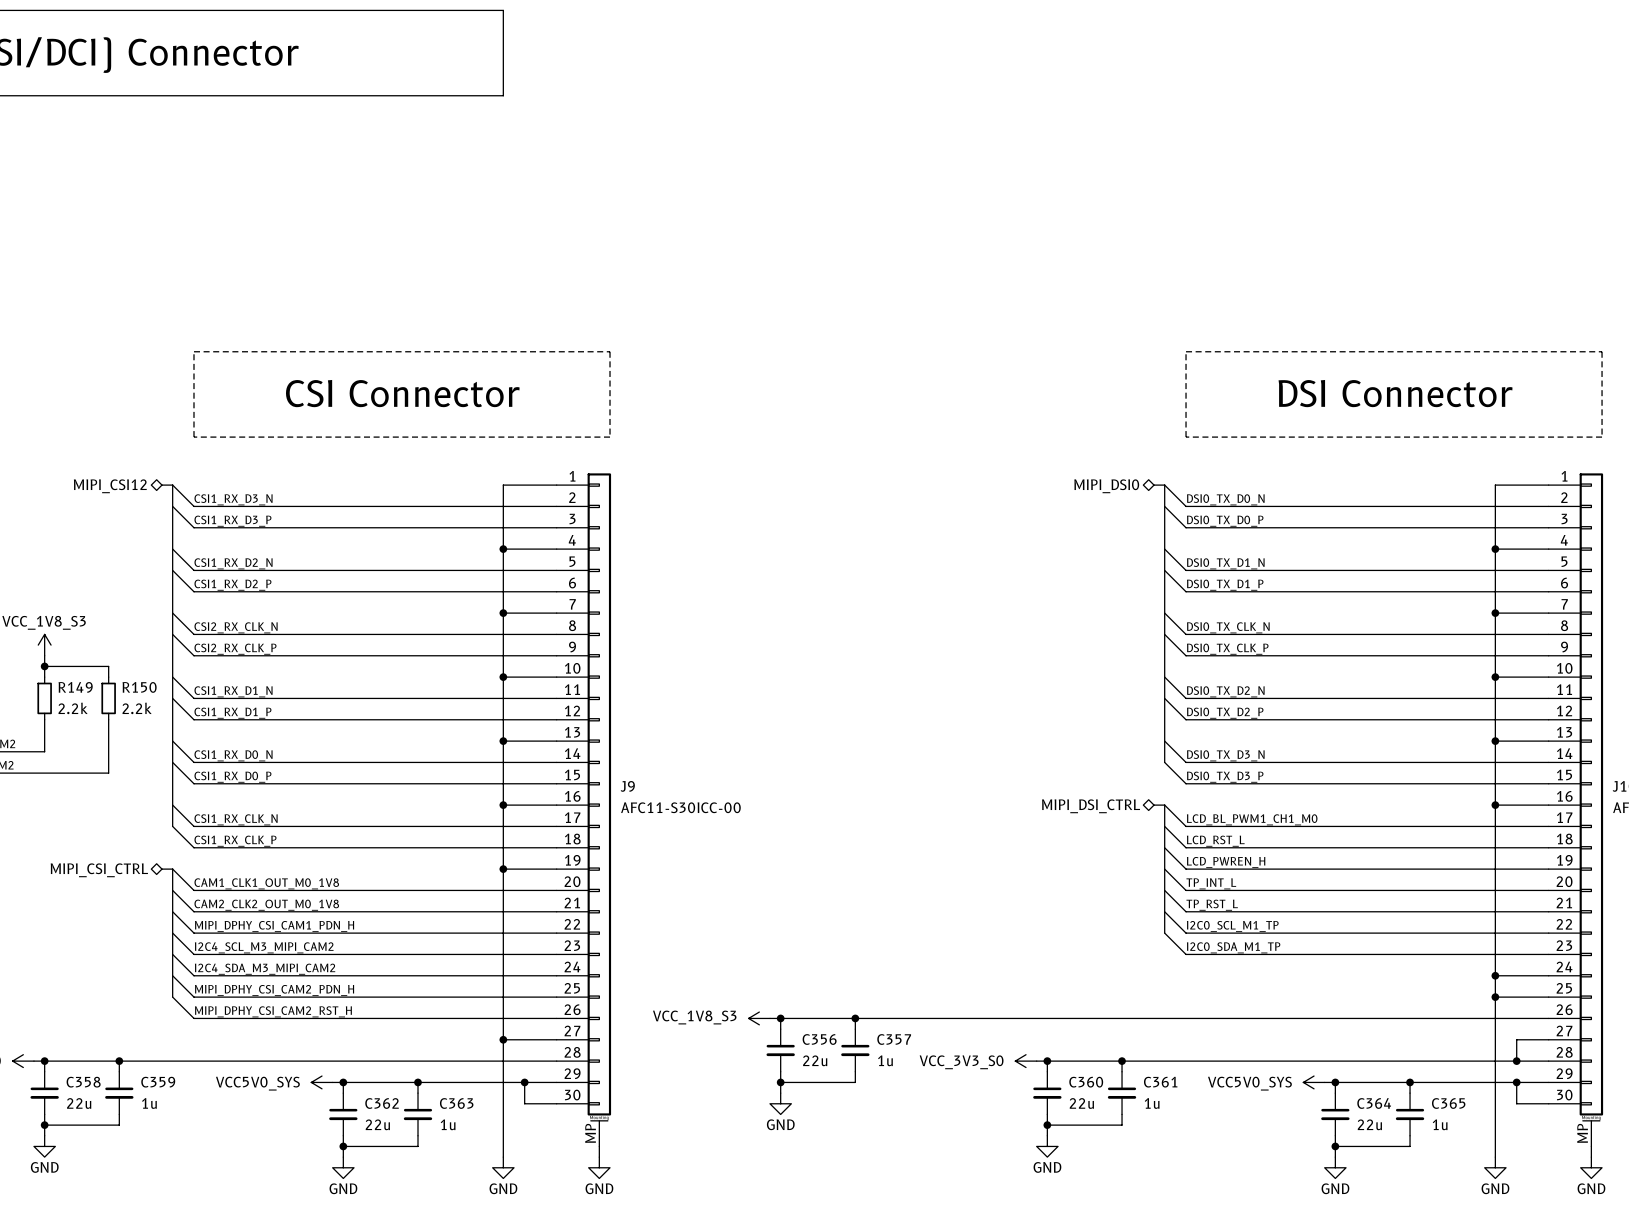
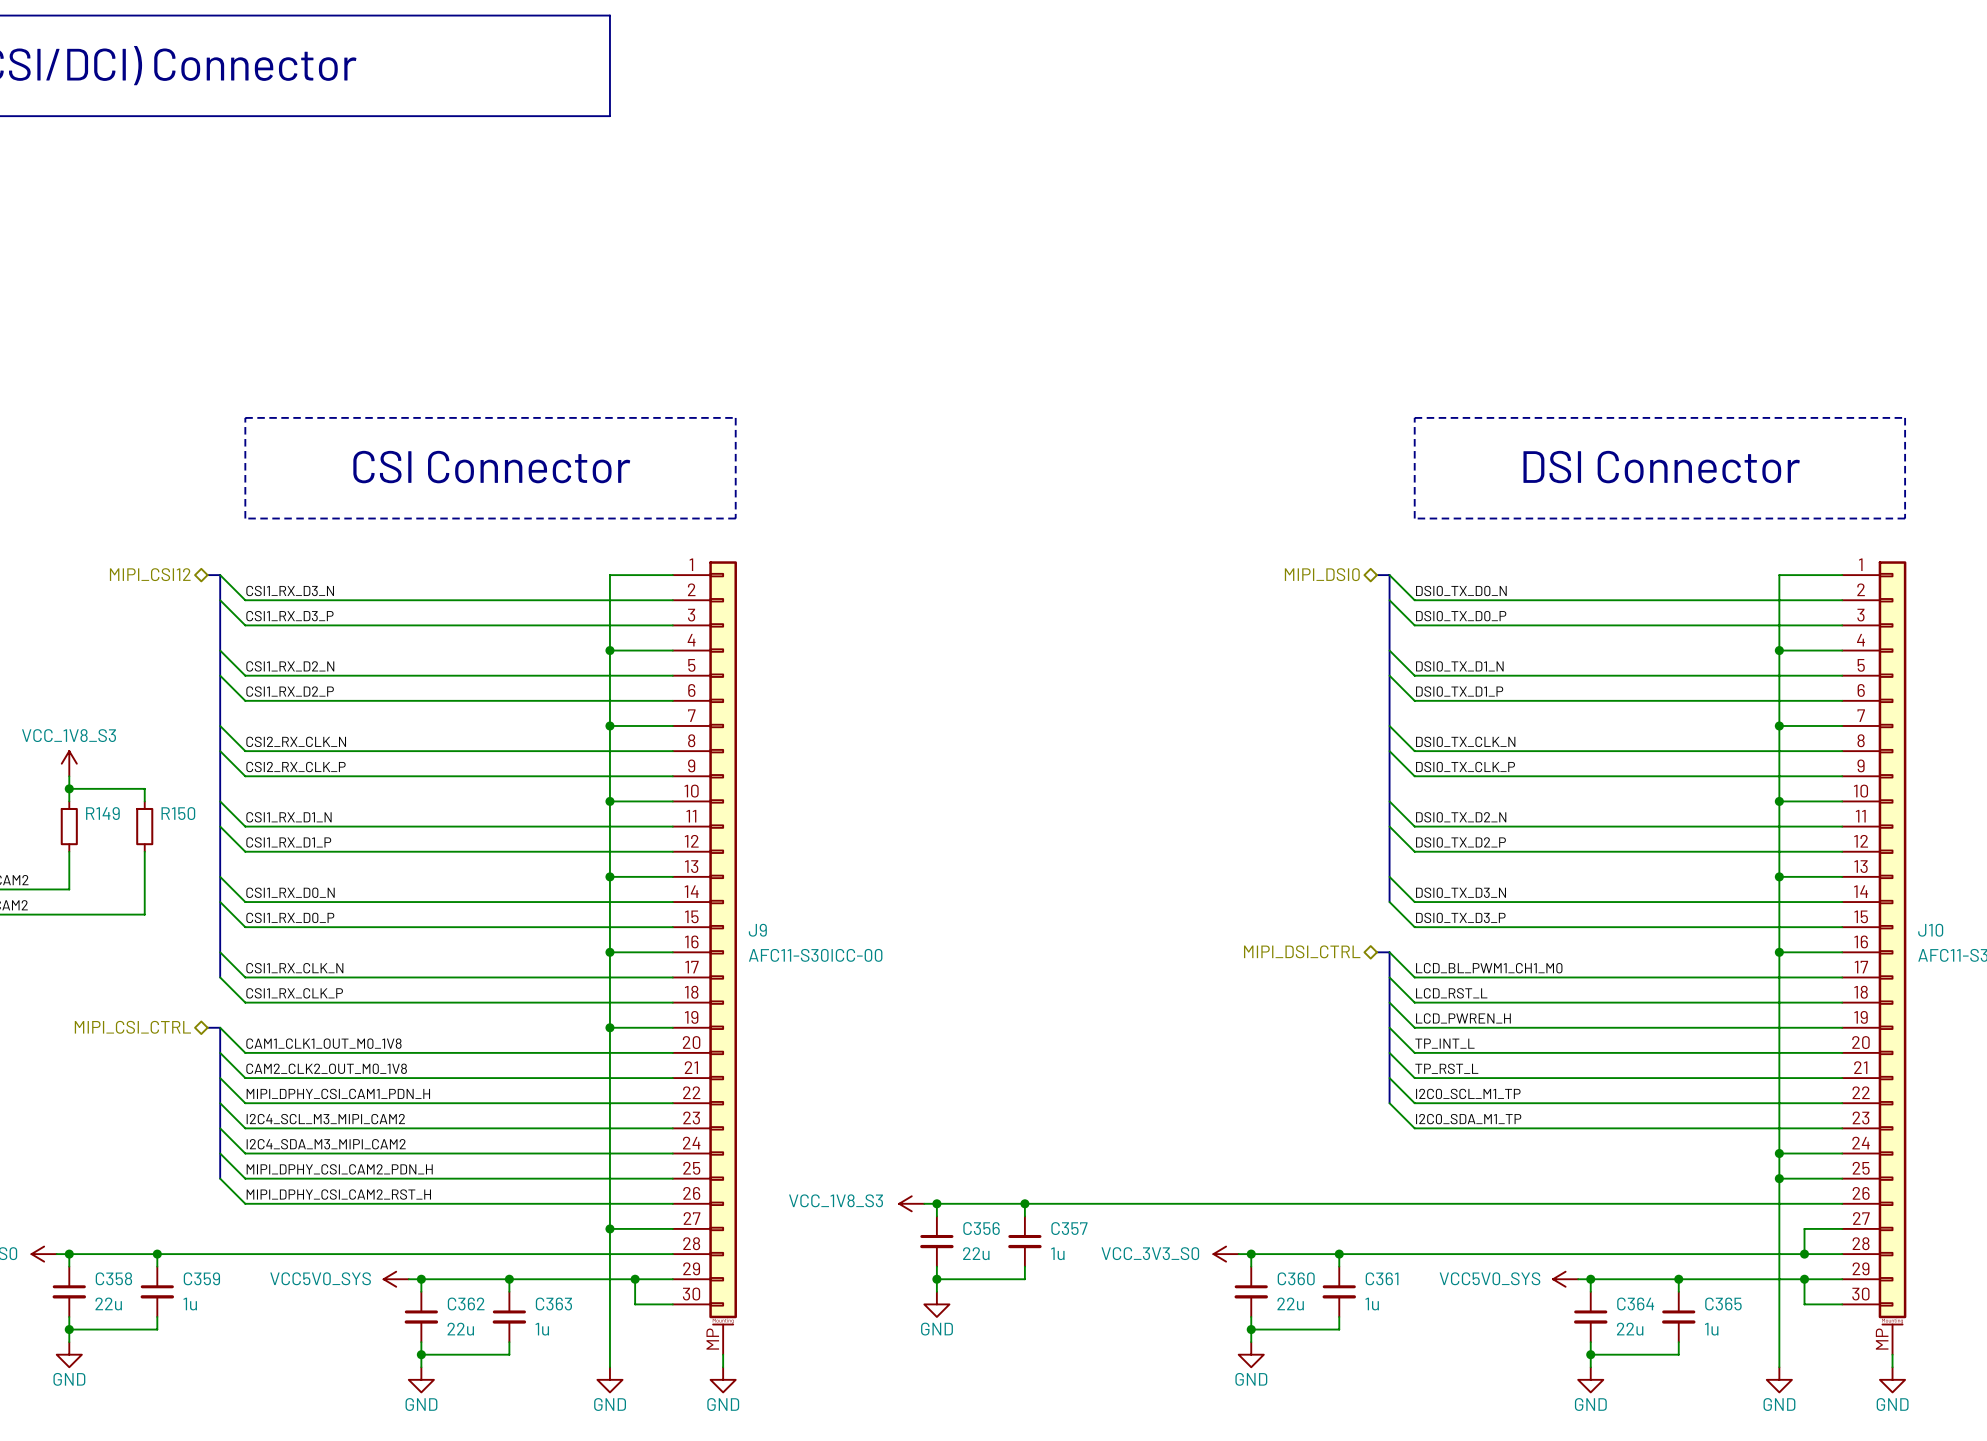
R149 value: 2.2k (73, 708) -> none
R150 value: 2.2k (137, 708) -> none

